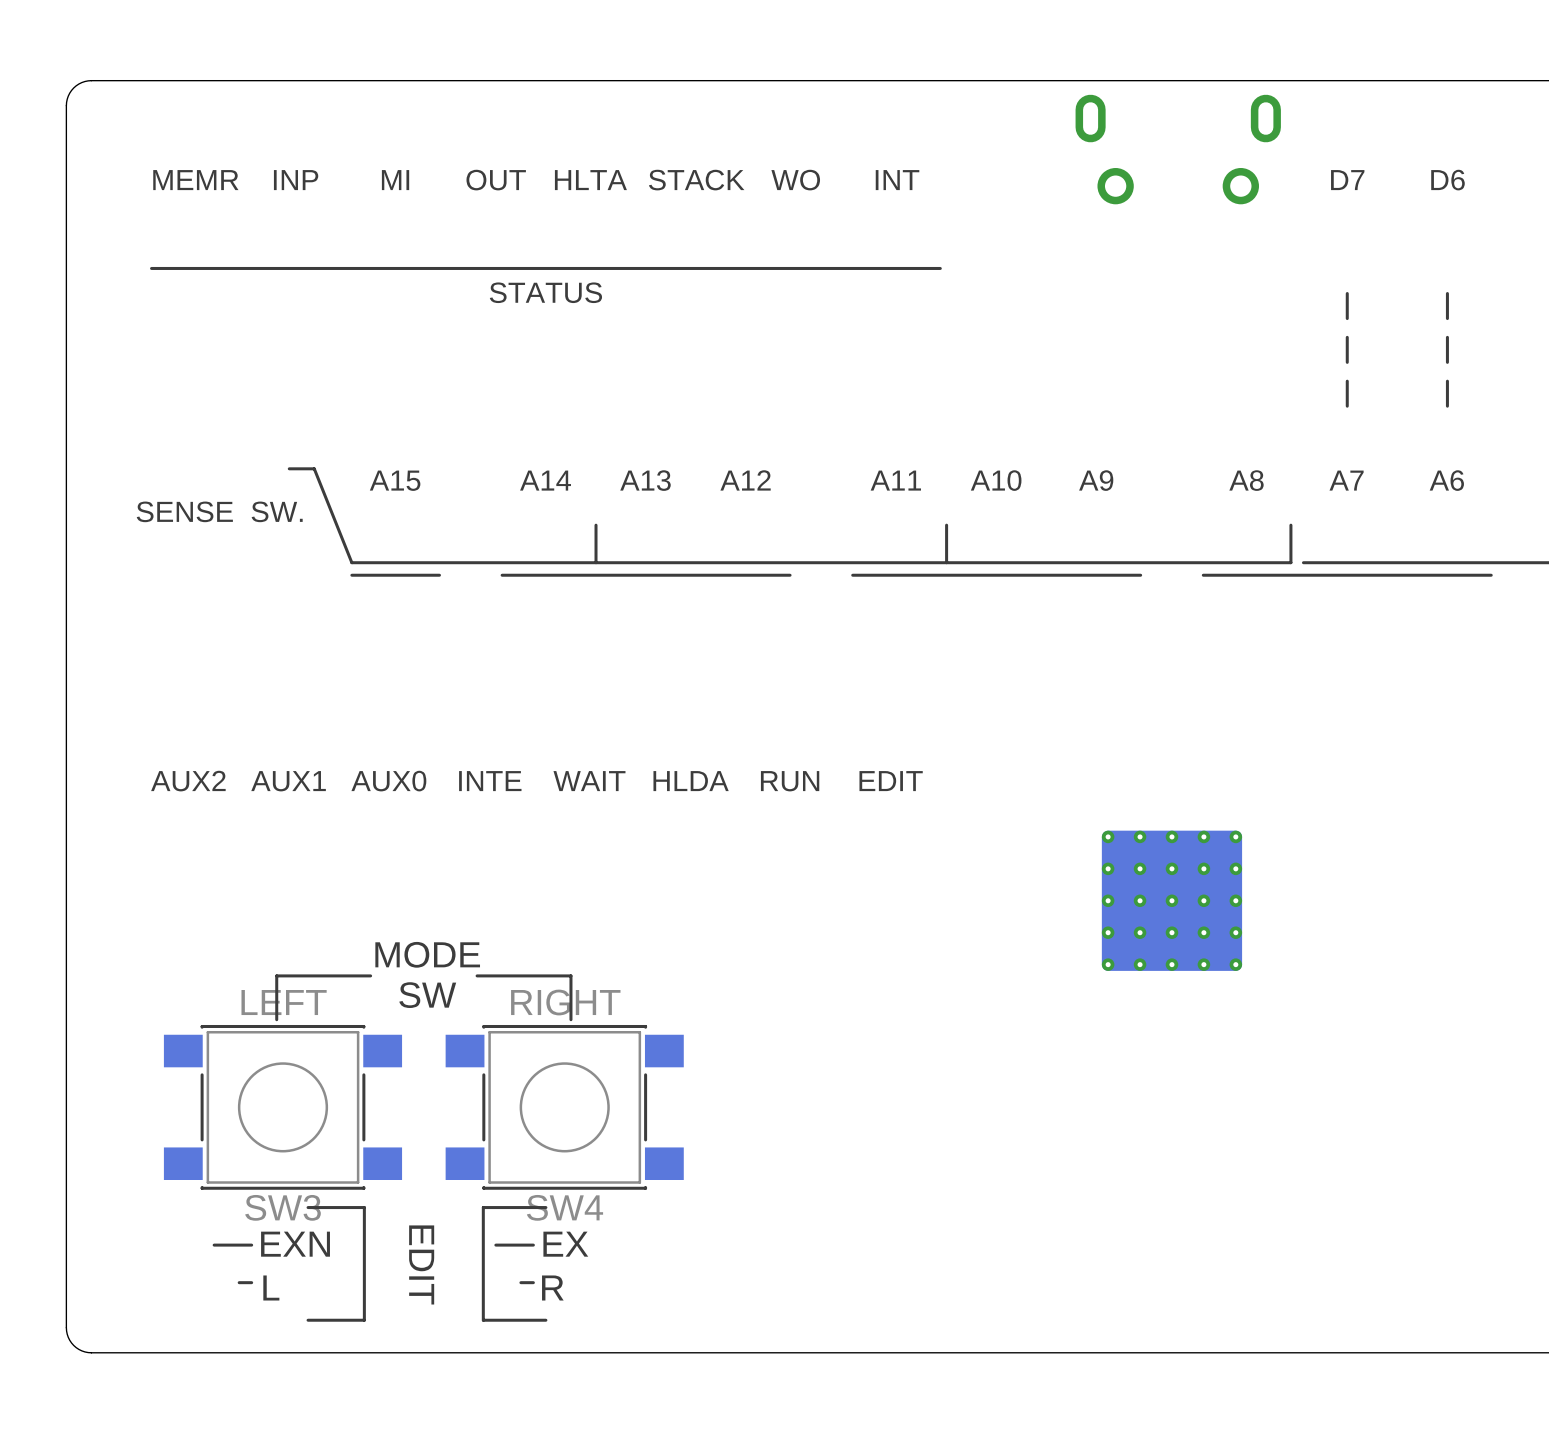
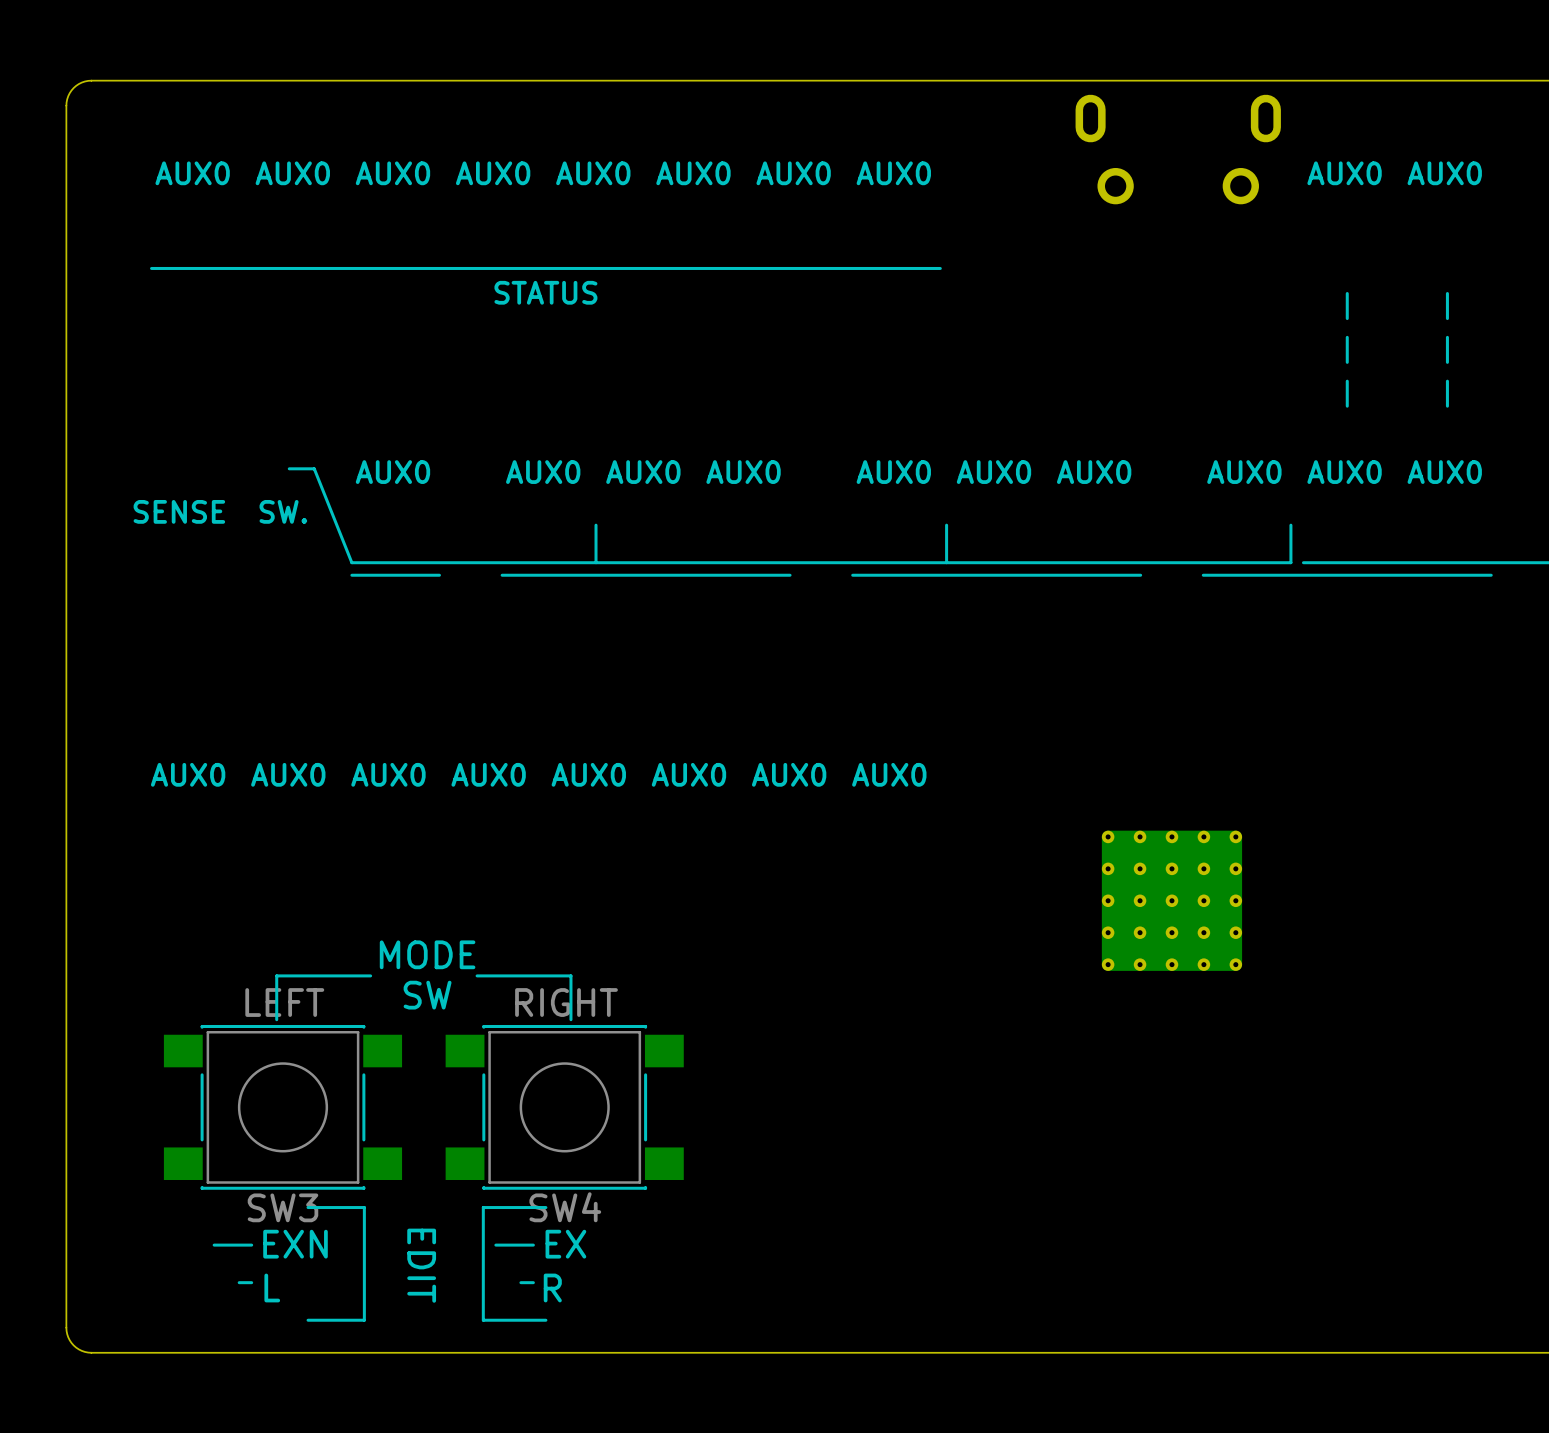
part text: none -> AUX0 (192, 173)
part text: none -> AUX0 (292, 173)
part text: none -> AUX0 (392, 173)
part text: none -> AUX0 (493, 173)
part text: none -> AUX0 (593, 173)
part text: none -> AUX0 (693, 173)
part text: none -> AUX0 (793, 173)
part text: none -> AUX0 (893, 173)
part text: none -> AUX0 (1344, 173)
part text: none -> AUX0 (1444, 173)
text: MEMR (195, 180) -> none
text: INP (296, 180) -> none
text: MI (395, 180) -> none
text: OUT (496, 180) -> none
text: HLTA (590, 180) -> none
text: STACK (696, 180) -> none
text: WO (795, 180) -> none
text: INT (897, 180) -> none
text: D7 (1347, 180) -> none
text: D6 (1447, 180) -> none
part text: none -> AUX0 (392, 472)
part text: none -> AUX0 (543, 472)
part text: none -> AUX0 (643, 472)
part text: none -> AUX0 (743, 472)
part text: none -> AUX0 (893, 472)
part text: none -> AUX0 (993, 472)
part text: none -> AUX0 (1094, 472)
part text: none -> AUX0 (1244, 472)
part text: none -> AUX0 (1344, 472)
part text: none -> AUX0 (1444, 472)
text: A15 (395, 480) -> none
text: A14 (545, 480) -> none
text: A13 (645, 480) -> none
text: A12 (745, 480) -> none
text: A11 (895, 480) -> none
text: A10 (996, 480) -> none
text: A9 (1096, 480) -> none
text: A8 (1246, 480) -> none
text: A7 (1346, 480) -> none
text: A6 (1446, 480) -> none
part text: none -> AUX0 (188, 774)
part text: none -> AUX0 (288, 774)
part text: none -> AUX0 (388, 774)
part text: none -> AUX0 (488, 774)
part text: none -> AUX0 (588, 774)
part text: none -> AUX0 (688, 774)
part text: none -> AUX0 (789, 774)
part text: none -> AUX0 (889, 774)
text: AUX2 (188, 781) -> none
text: AUX1 (288, 781) -> none
text: AUX0 (388, 781) -> none
text: INTE (490, 781) -> none
text: WAIT (589, 781) -> none
text: HLDA (691, 781) -> none
text: RUN (790, 781) -> none
text: EDIT (891, 781) -> none

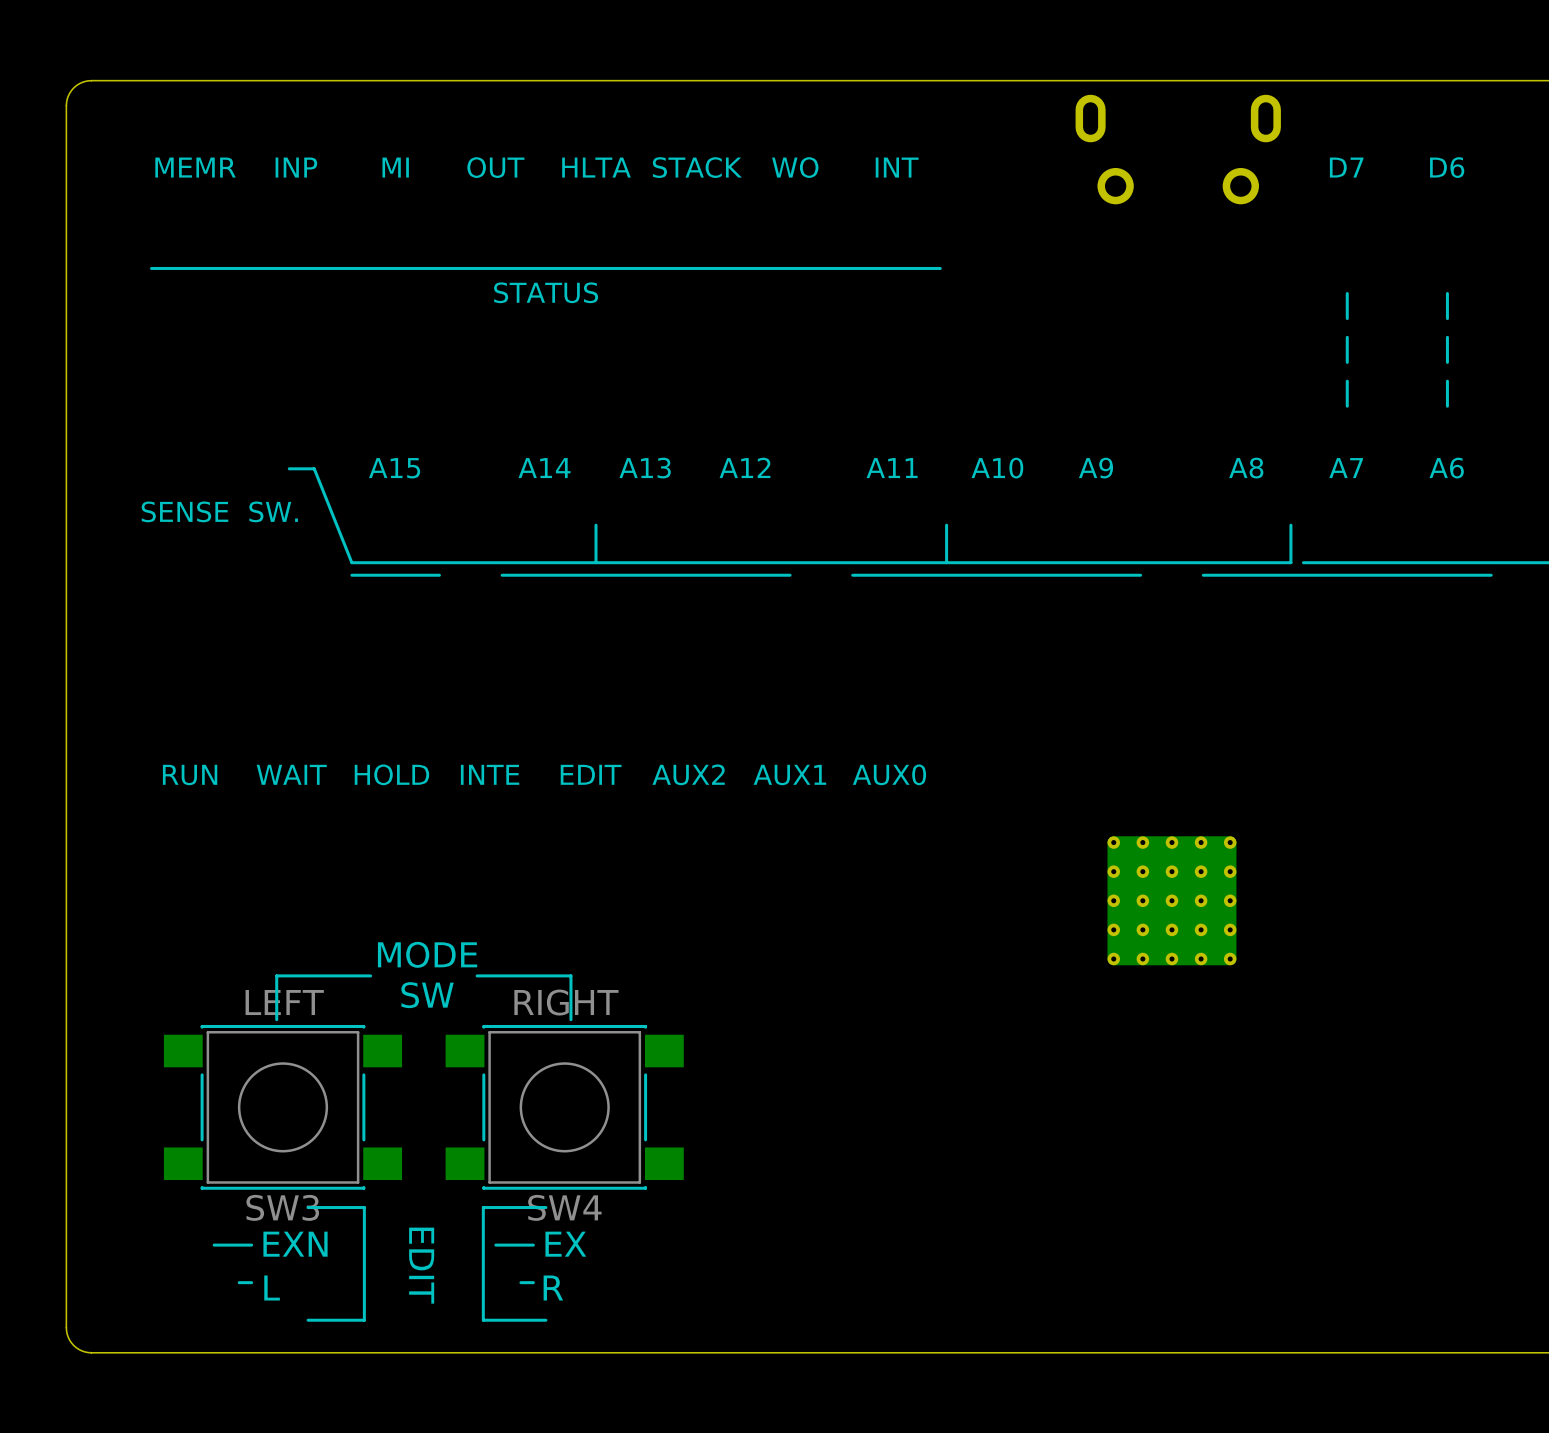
part text: none -> MEMR (195, 167)
part text: none -> INP (296, 167)
part text: none -> MI (395, 167)
part text: none -> OUT (495, 167)
part text: none -> HLTA (596, 167)
part text: none -> STACK (697, 167)
part text: none -> WO (795, 167)
part text: none -> INT (897, 167)
part text: none -> D7 (1346, 167)
part text: none -> D6 (1447, 167)
part text: AUX0 (192, 173) -> none
part text: AUX0 (292, 173) -> none
part text: AUX0 (392, 173) -> none
part text: AUX0 (493, 173) -> none
part text: AUX0 (593, 173) -> none
part text: AUX0 (693, 173) -> none
part text: AUX0 (793, 173) -> none
part text: AUX0 (893, 173) -> none
part text: AUX0 (1344, 173) -> none
part text: AUX0 (1444, 173) -> none
part text: none -> A14 (544, 468)
part text: none -> A15 (394, 468)
part text: none -> A13 (645, 468)
part text: none -> A12 (744, 467)
part text: none -> A11 (892, 468)
part text: none -> A10 (997, 468)
part text: none -> A9 (1095, 468)
part text: none -> A8 (1246, 468)
part text: none -> A7 (1346, 468)
part text: none -> A6 (1446, 468)
part text: AUX0 (392, 472) -> none
part text: AUX0 (543, 472) -> none
part text: AUX0 (643, 472) -> none
part text: AUX0 (743, 472) -> none
part text: AUX0 (893, 472) -> none
part text: AUX0 (993, 472) -> none
part text: AUX0 (1094, 472) -> none
part text: AUX0 (1244, 472) -> none
part text: AUX0 (1344, 472) -> none
part text: AUX0 (1444, 472) -> none
part text: AUX0 (188, 774) -> none
part text: none -> RUN (190, 775)
part text: AUX0 (288, 774) -> none
part text: none -> WAIT (291, 774)
part text: AUX0 (388, 774) -> none
part text: none -> HOLD (391, 774)
part text: AUX0 (488, 774) -> INTE (490, 774)
part text: AUX0 (588, 774) -> EDIT (591, 774)
part text: AUX0 (688, 774) -> AUX2 (688, 774)
part text: AUX0 (789, 774) -> none
part text: none -> AUX1 (789, 775)
part footprint: [1101, 830, 1243, 971] -> [1107, 836, 1237, 966]

